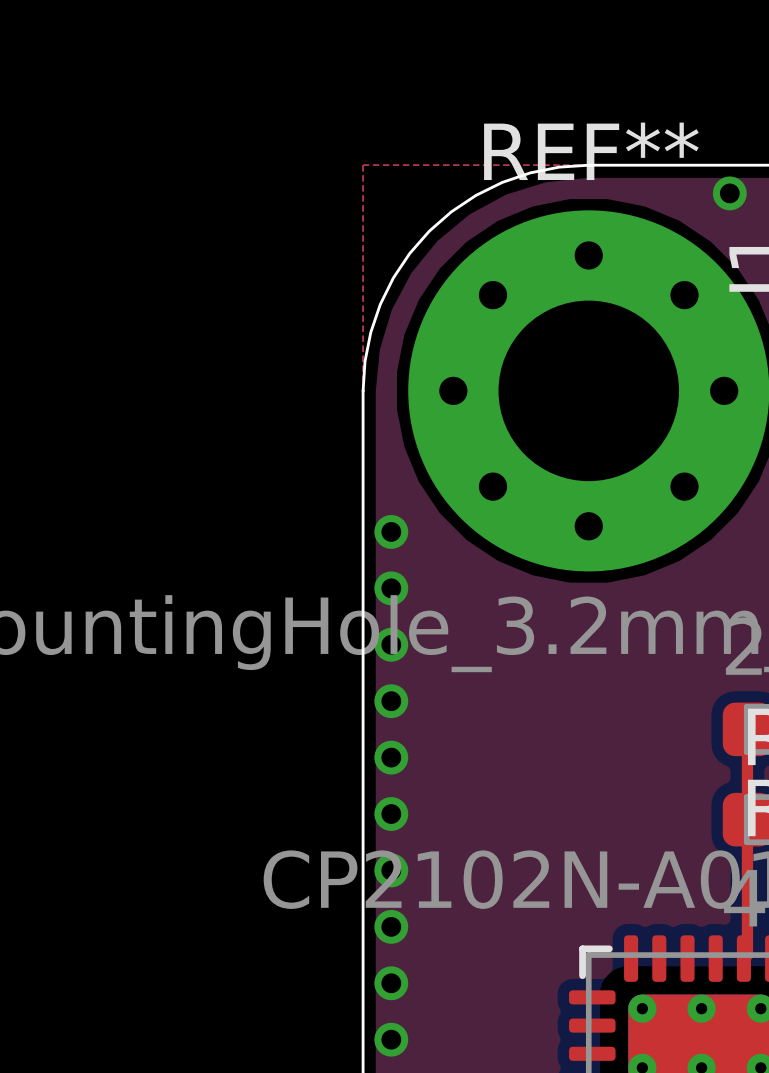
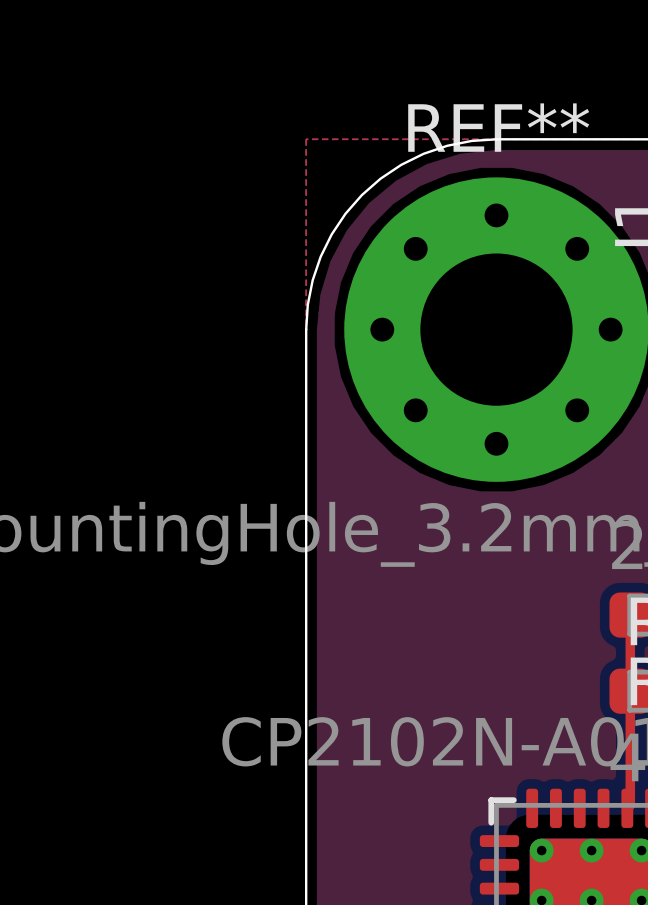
via: (729, 193) -> none
via: (391, 531) -> none
via: (391, 588) -> none
via: (391, 644) -> none
via: (391, 701) -> none
via: (391, 757) -> none
via: (391, 814) -> none
via: (391, 870) -> none
via: (391, 926) -> none
via: (391, 983) -> none
via: (391, 1039) -> none

